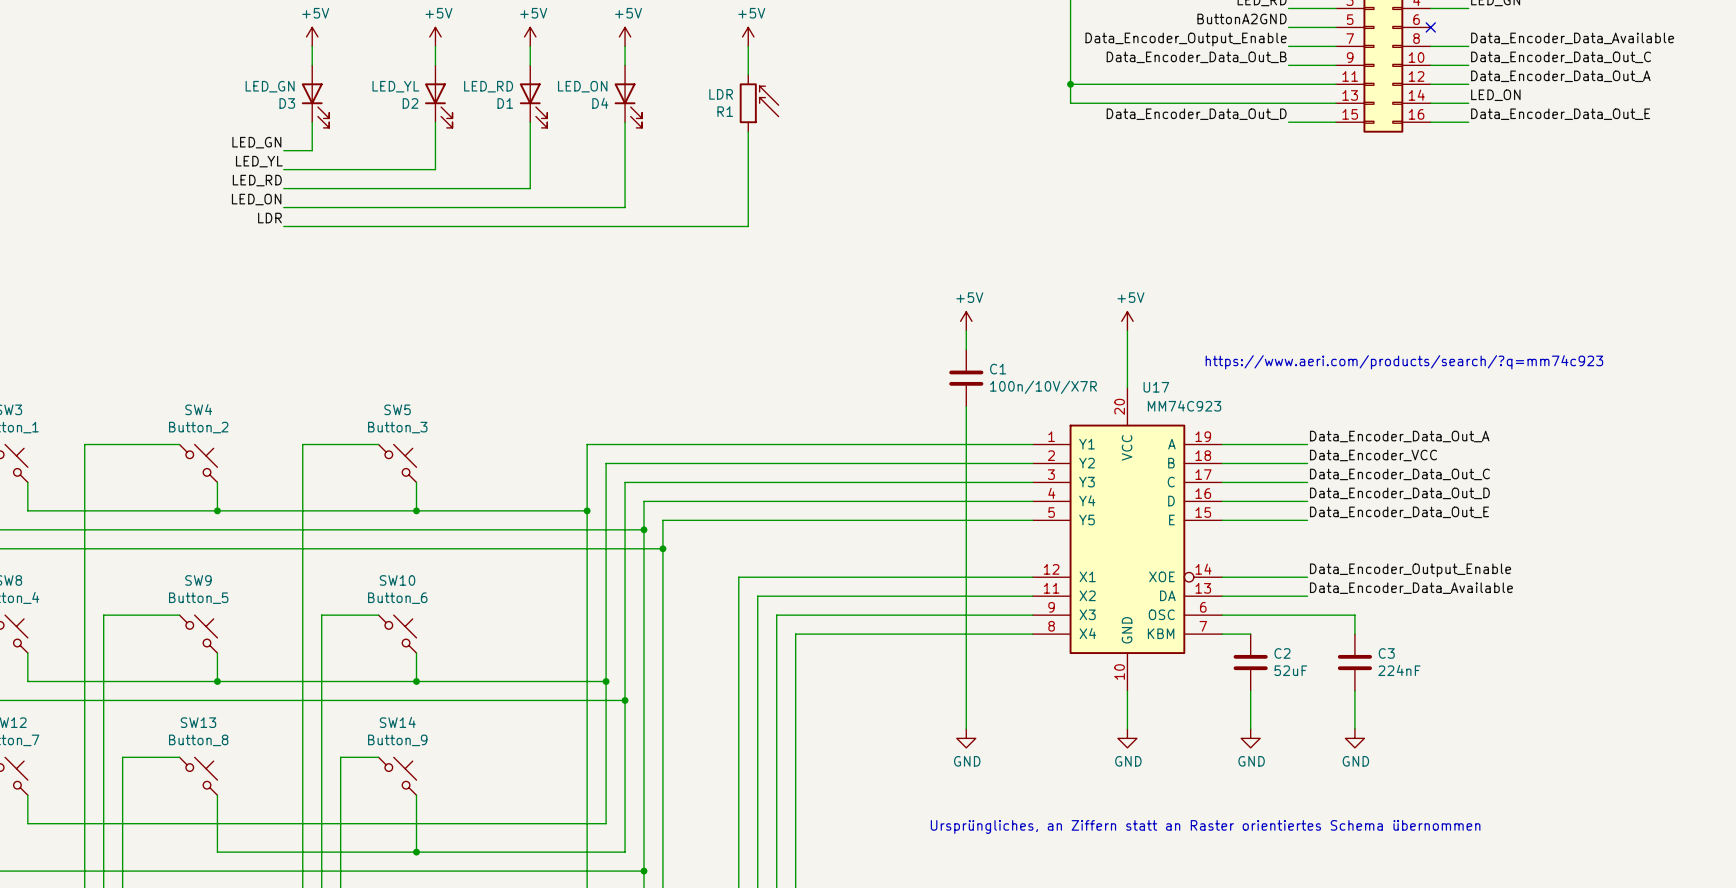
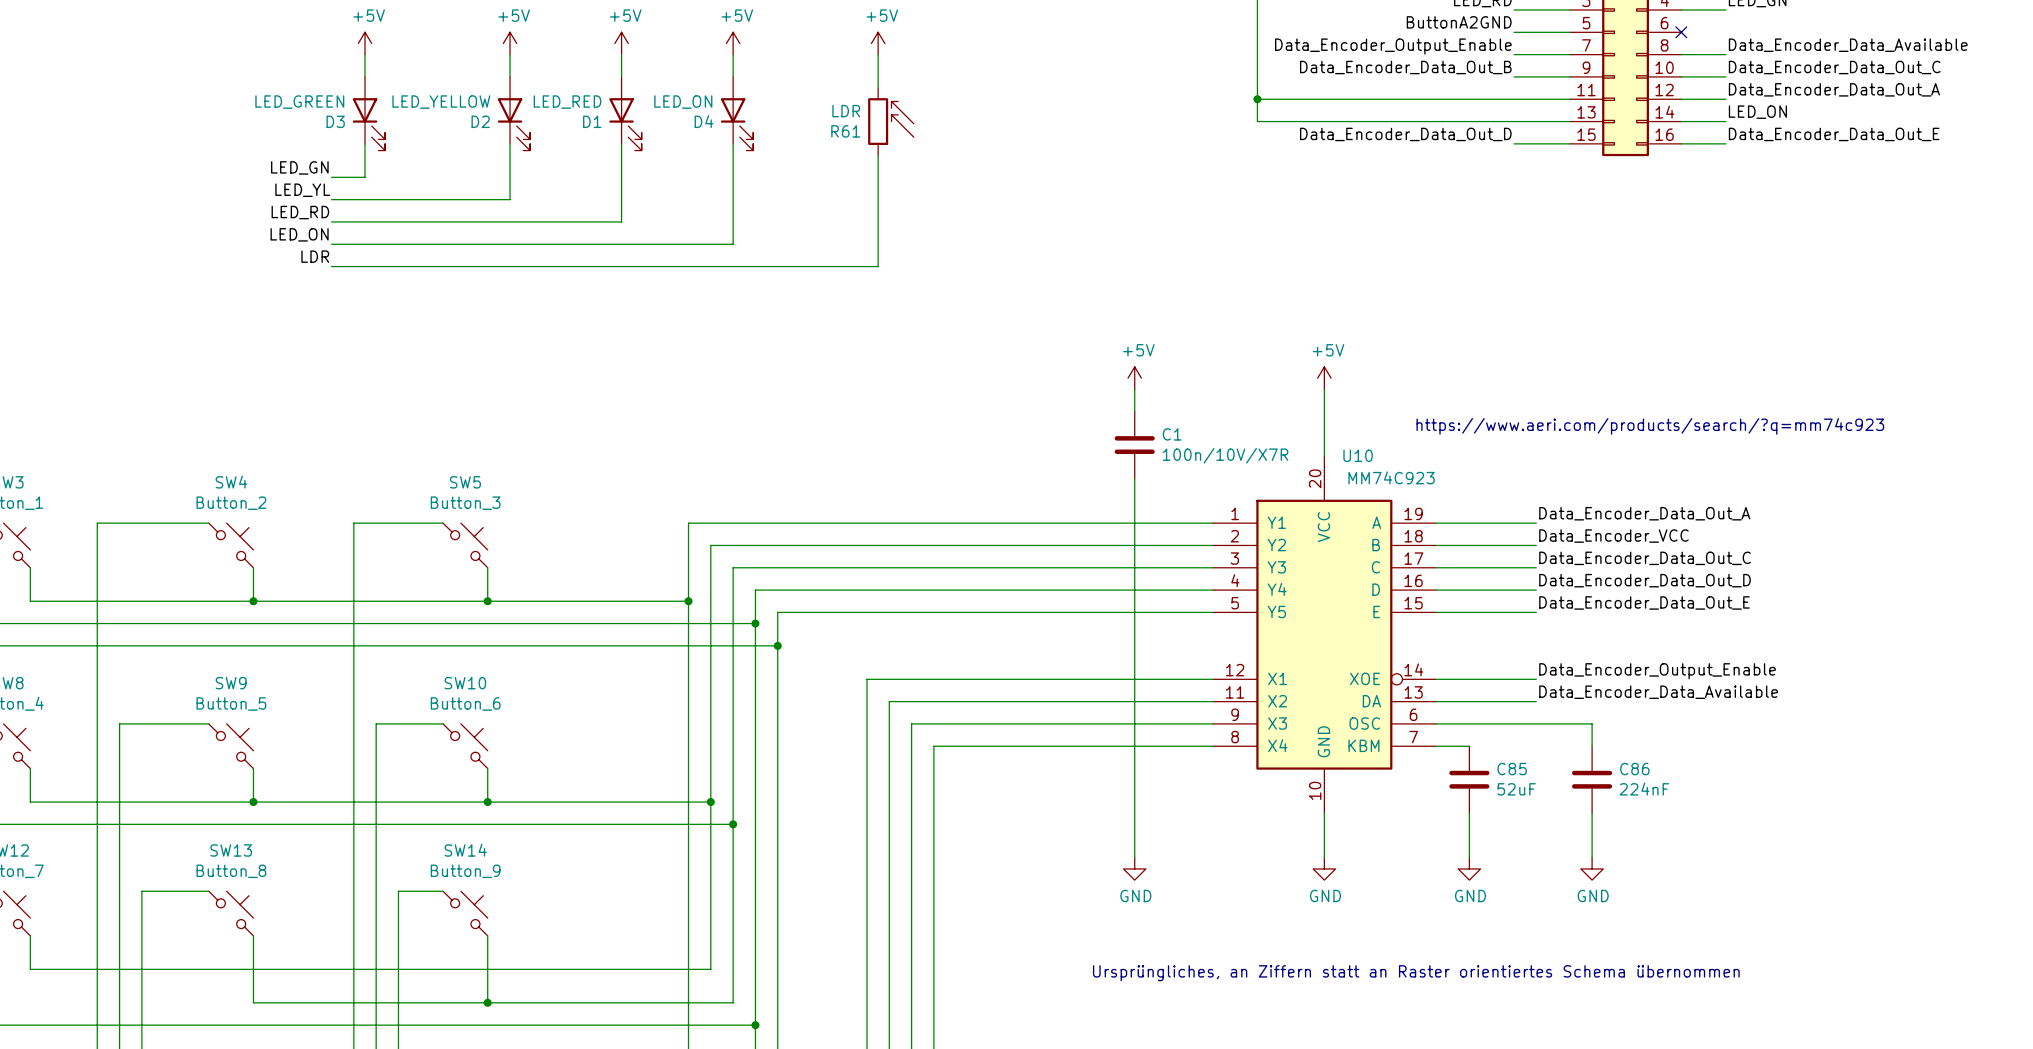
D3 value: LED_GN (270, 86) -> LED_GREEN (299, 102)
D2 value: LED_YL (395, 86) -> LED_YELLOW (441, 102)
D1 value: LED_RD (488, 86) -> LED_RED (567, 102)
R1 name: R1 (725, 111) -> R61 (845, 131)
U17 name: U17 (1156, 387) -> U10 (1358, 455)
C2 name: C2 (1282, 653) -> C85 (1512, 769)
C3 name: C3 (1386, 653) -> C86 (1634, 769)

